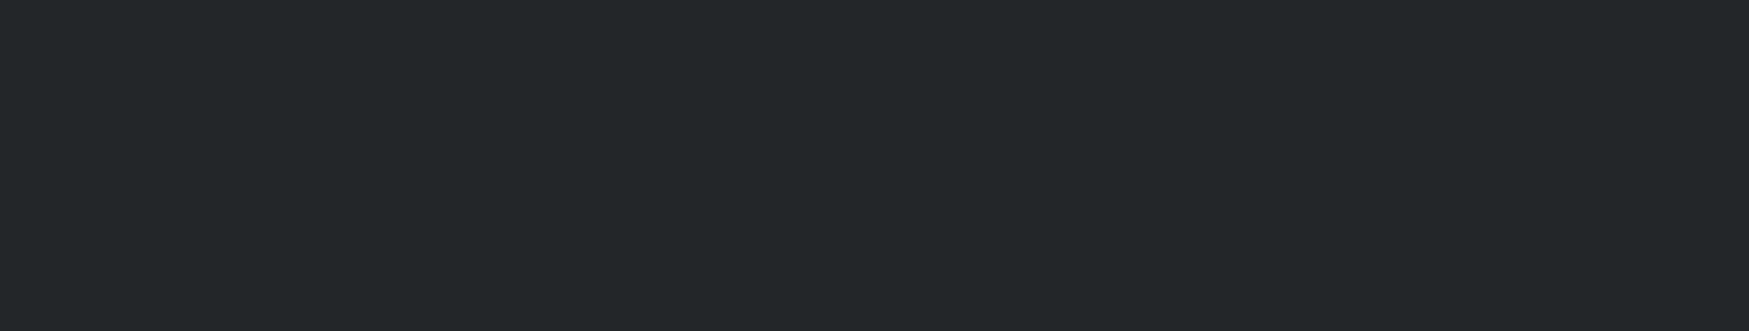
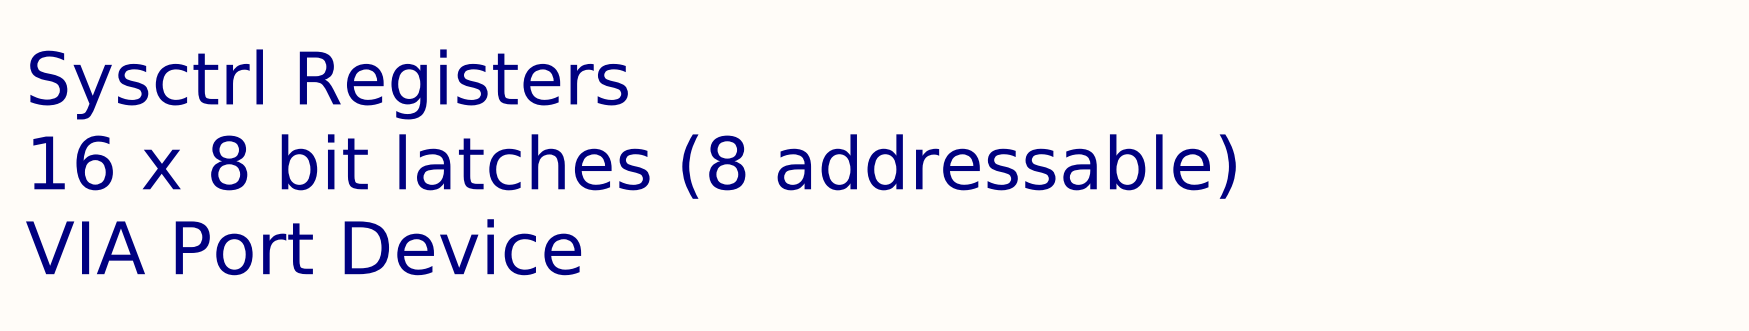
text: none -> Sysctrl Registers (329, 84)
text: none -> 16 x 8 bit latches (8 addressable) (634, 166)
text: none -> VIA Port Device (303, 247)

